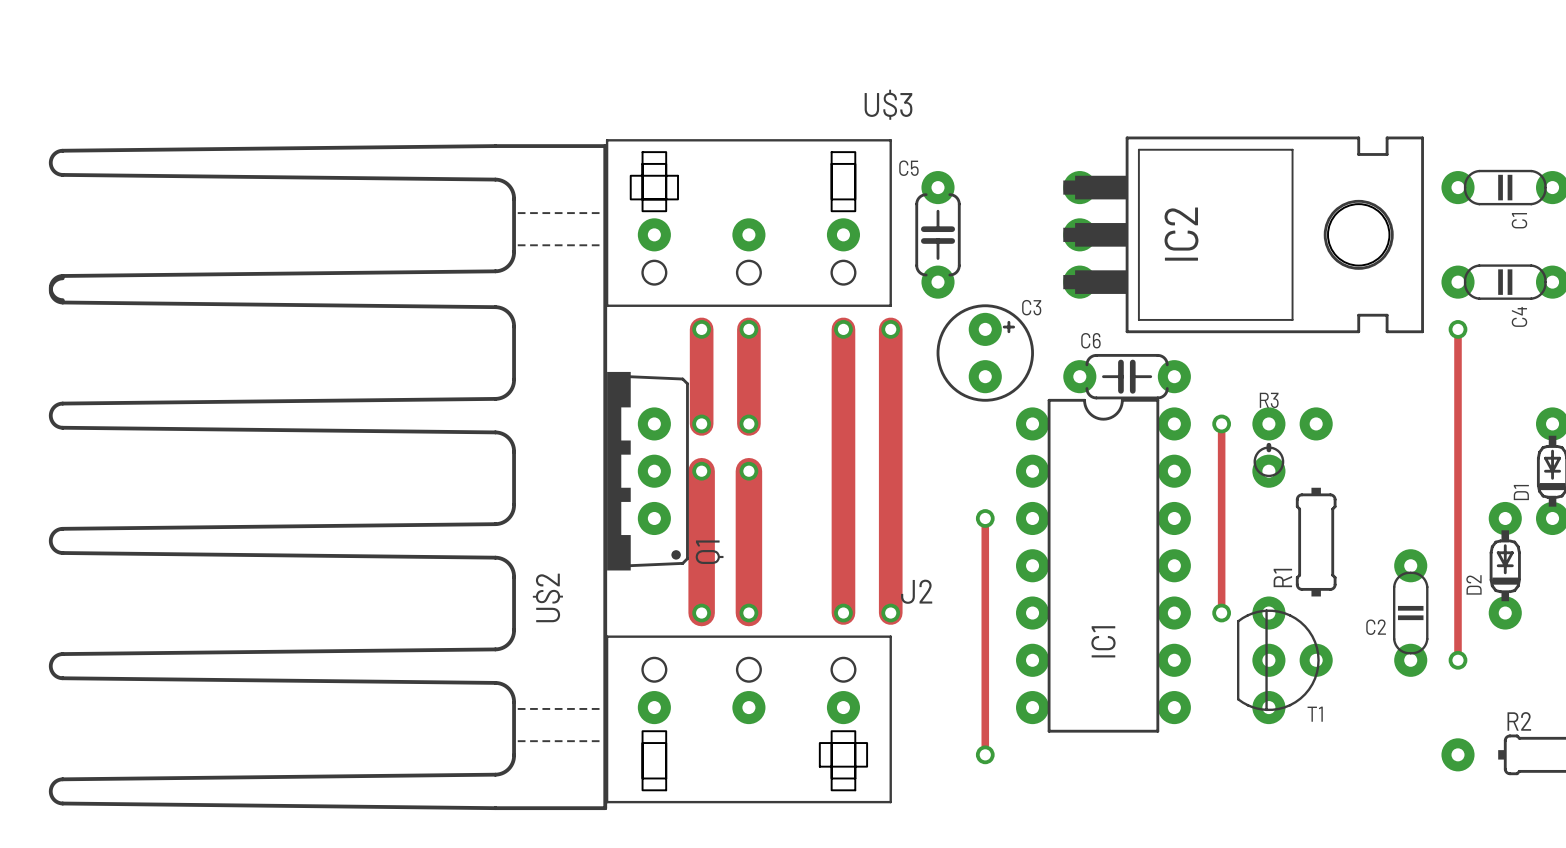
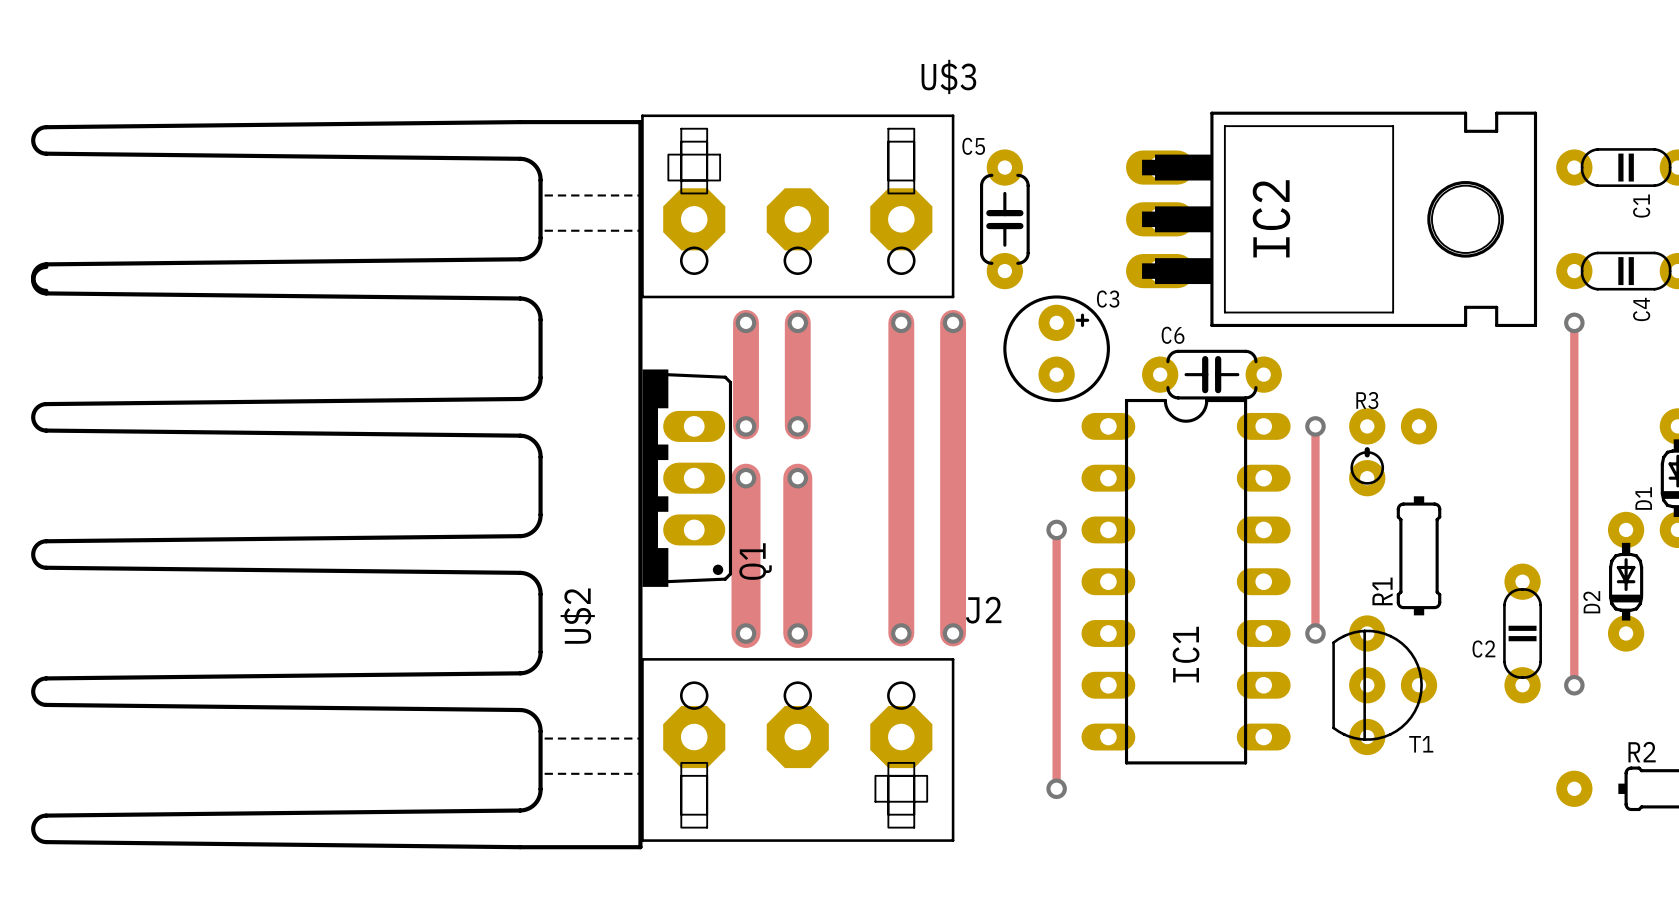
IC2 footprint: [1063, 136, 1424, 334] -> [1126, 111, 1538, 328]
U$3 footprint: [605, 139, 892, 307] -> [641, 114, 955, 299]
Q1 footprint: [607, 371, 689, 571] -> [642, 369, 733, 587]
IC1 footprint: [1016, 398, 1191, 733] -> [1081, 398, 1291, 765]
J2 footprint: [605, 635, 892, 804] -> [641, 658, 955, 842]

